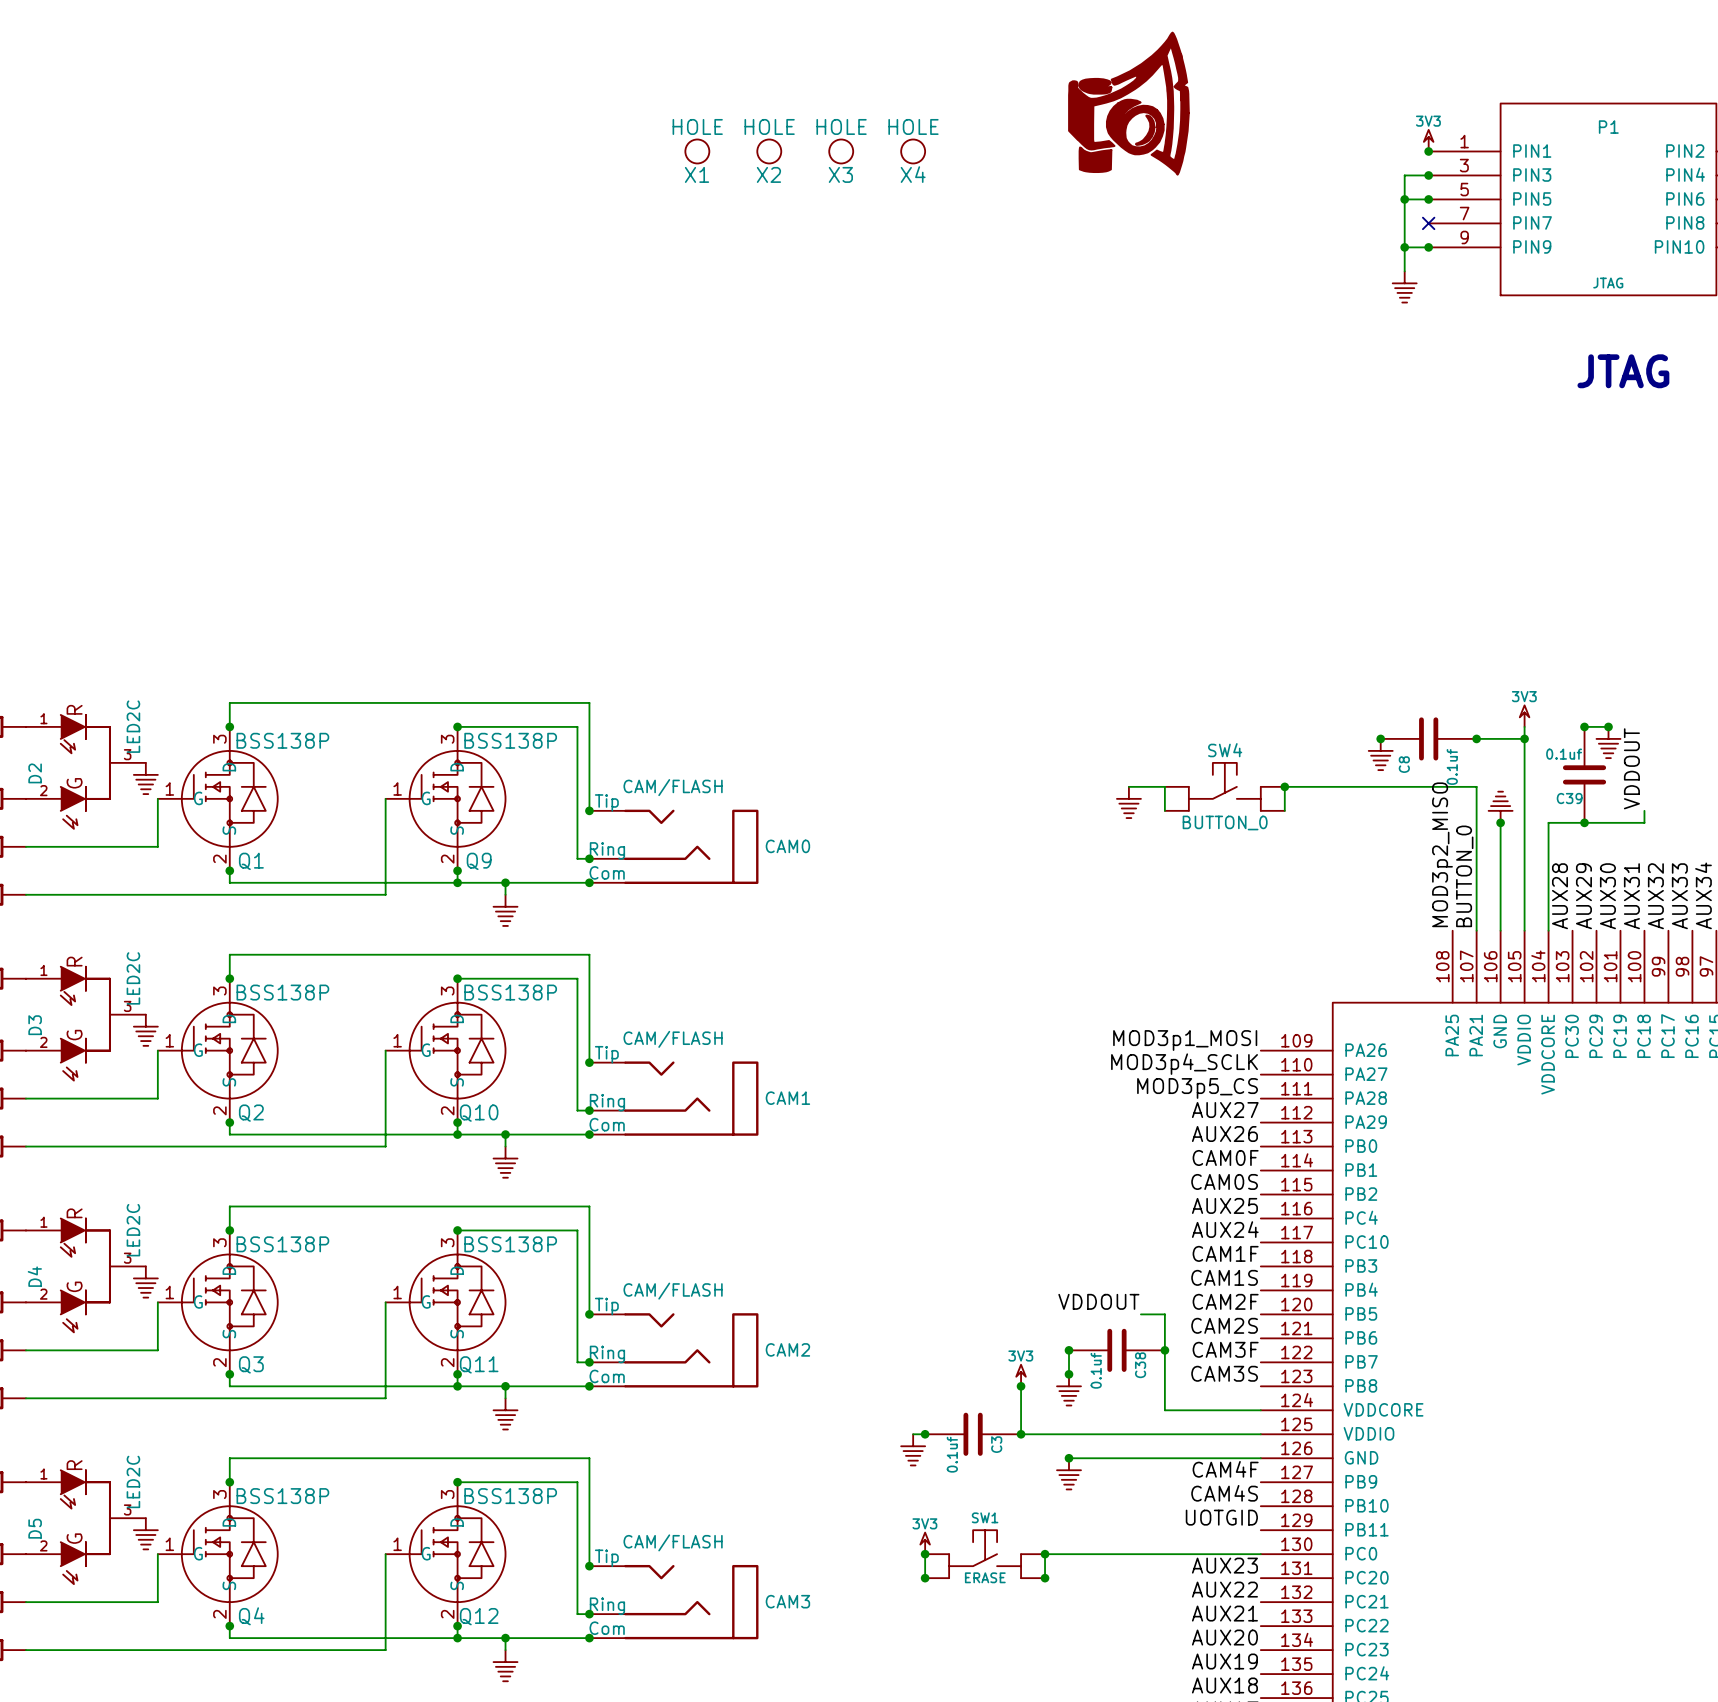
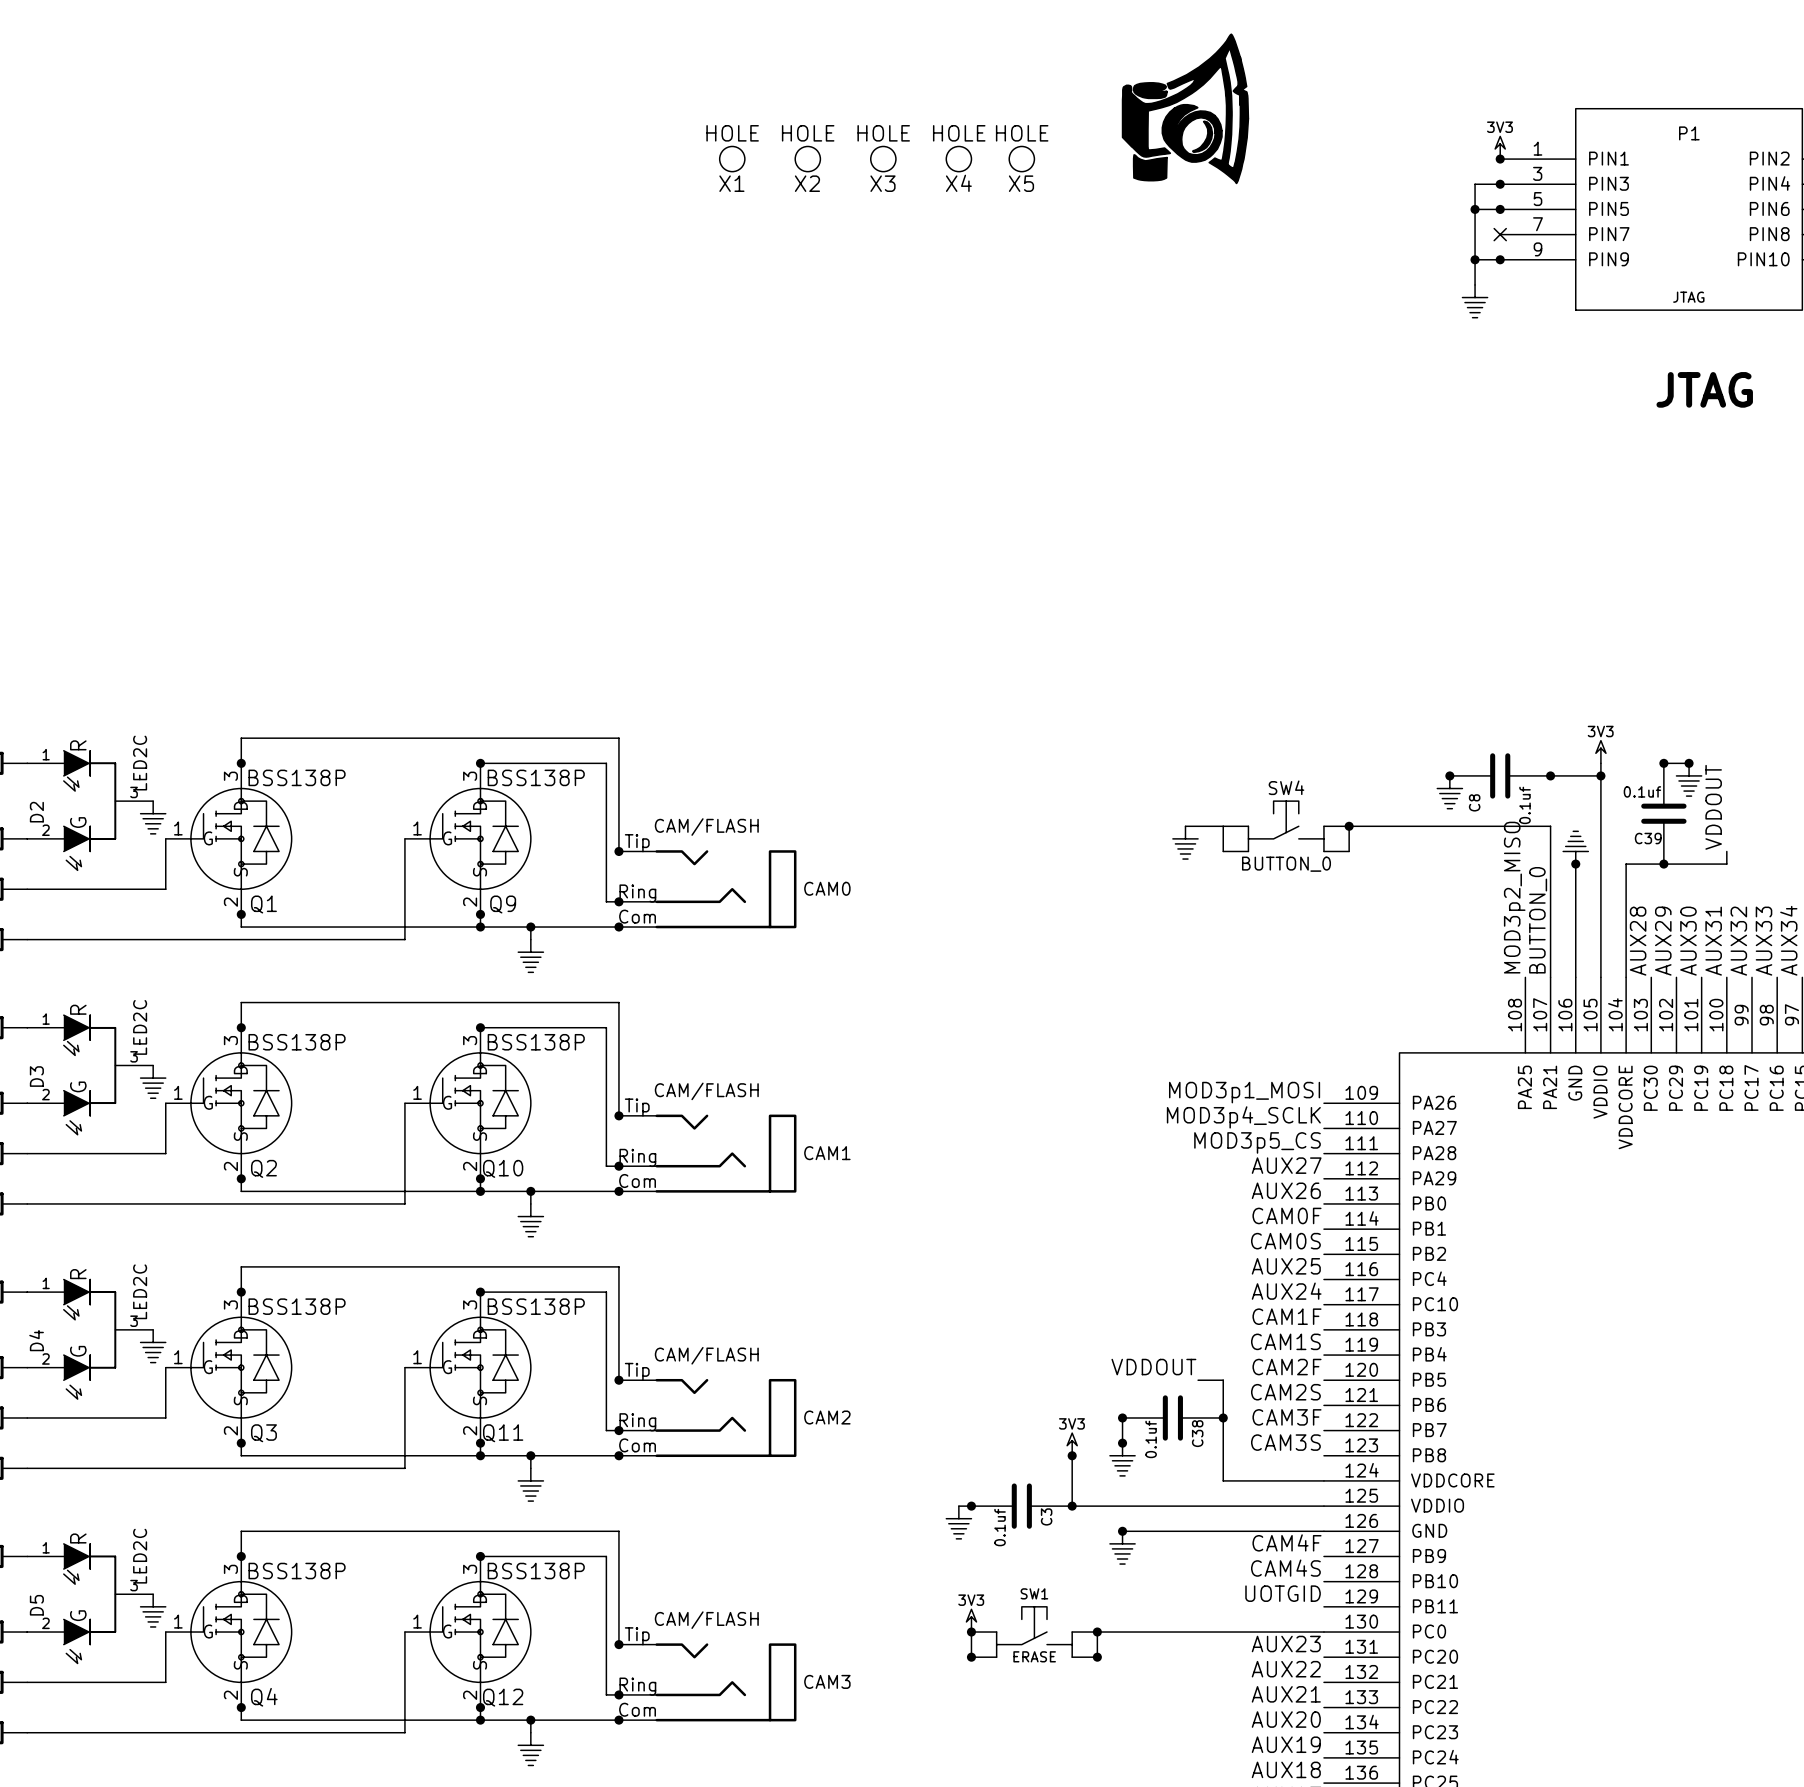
X5: none -> HOLE (1021, 159)

